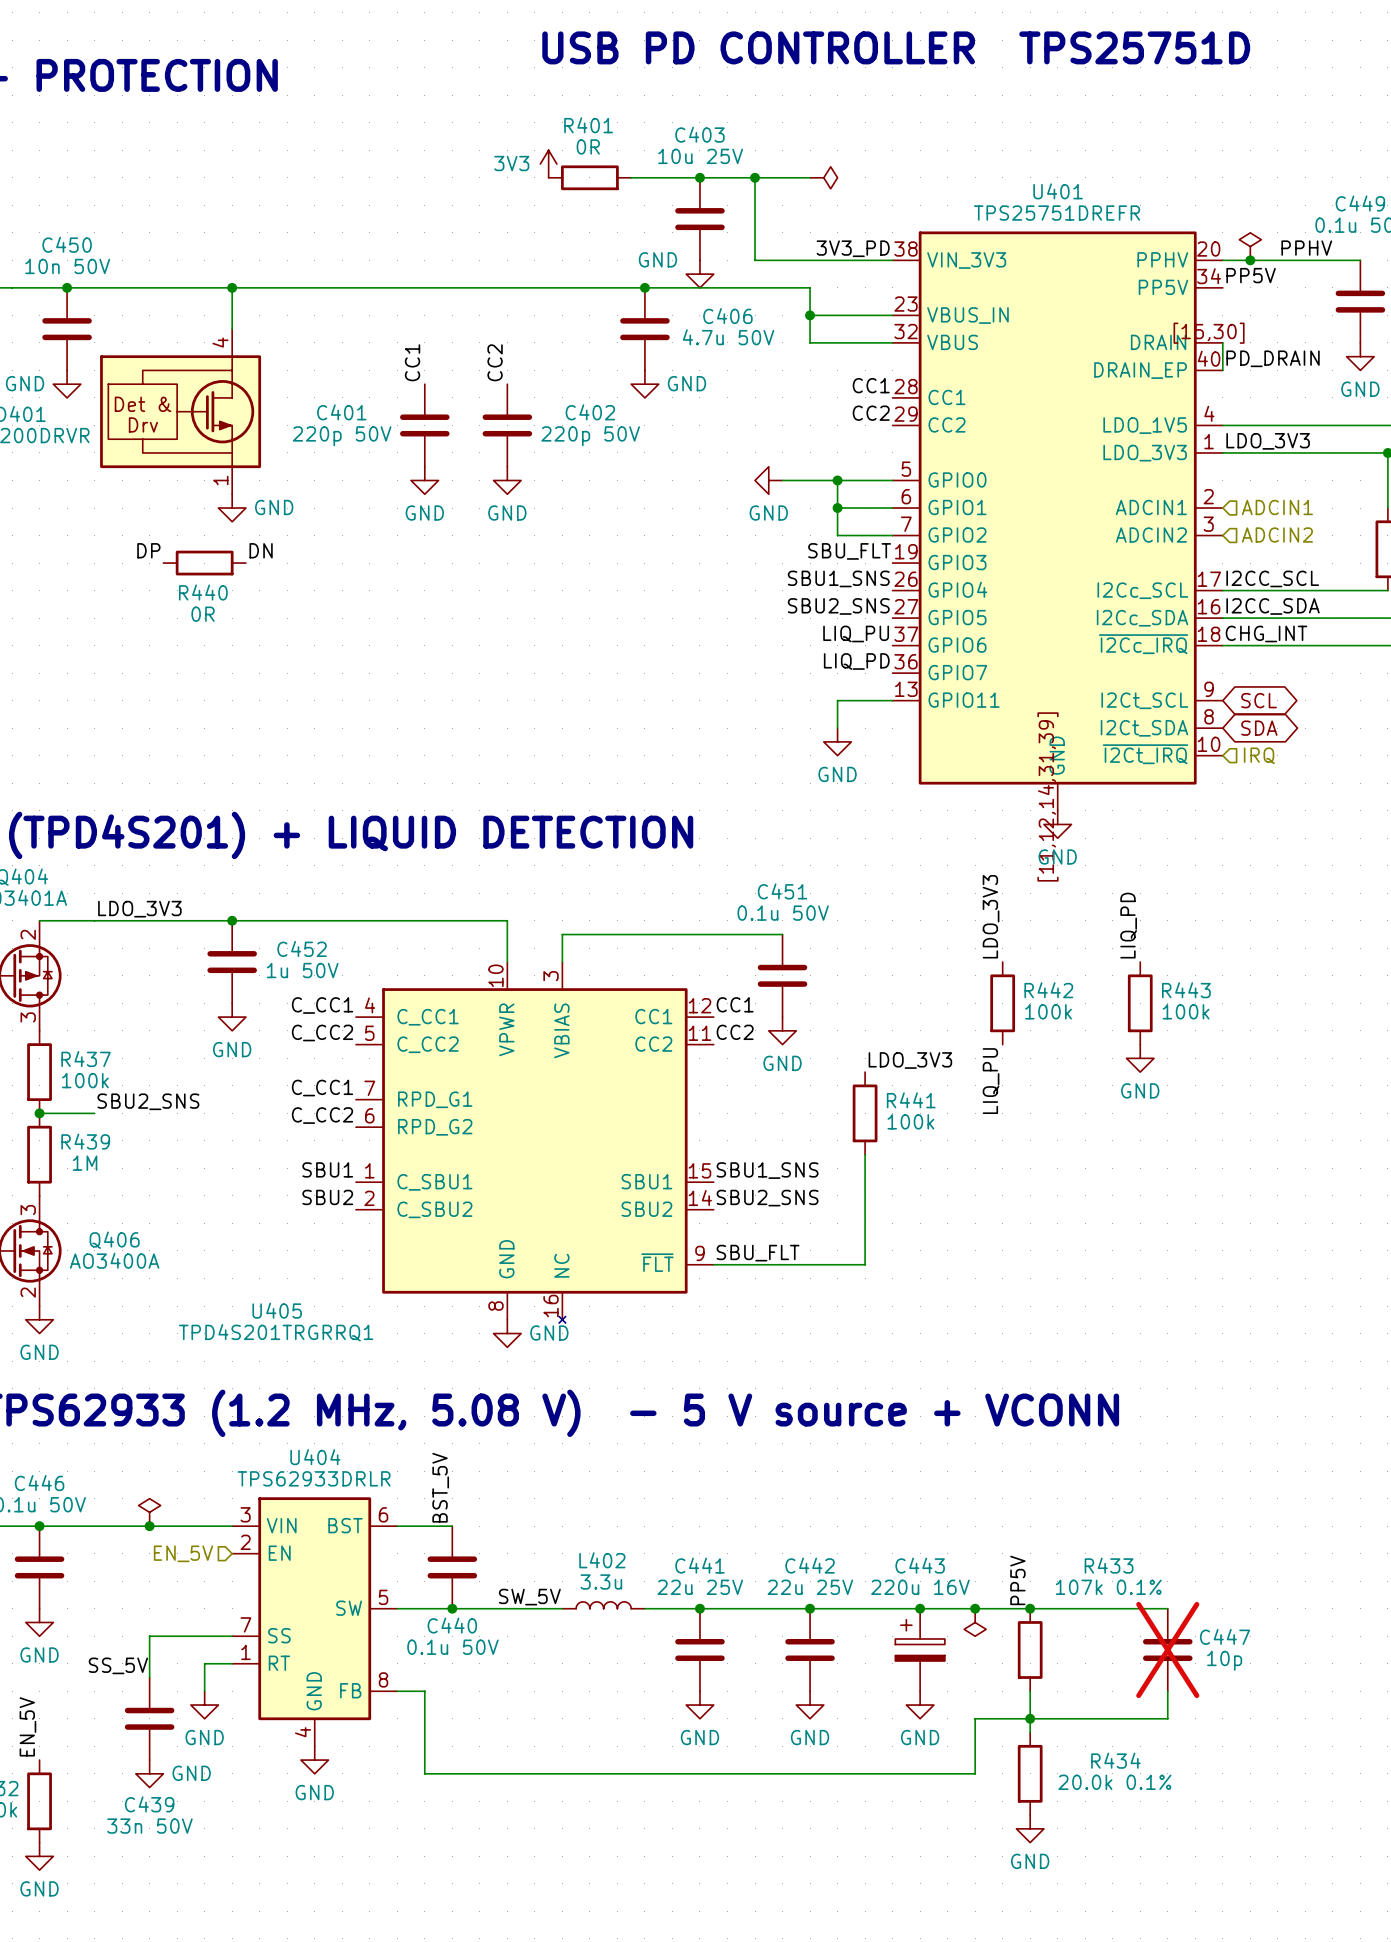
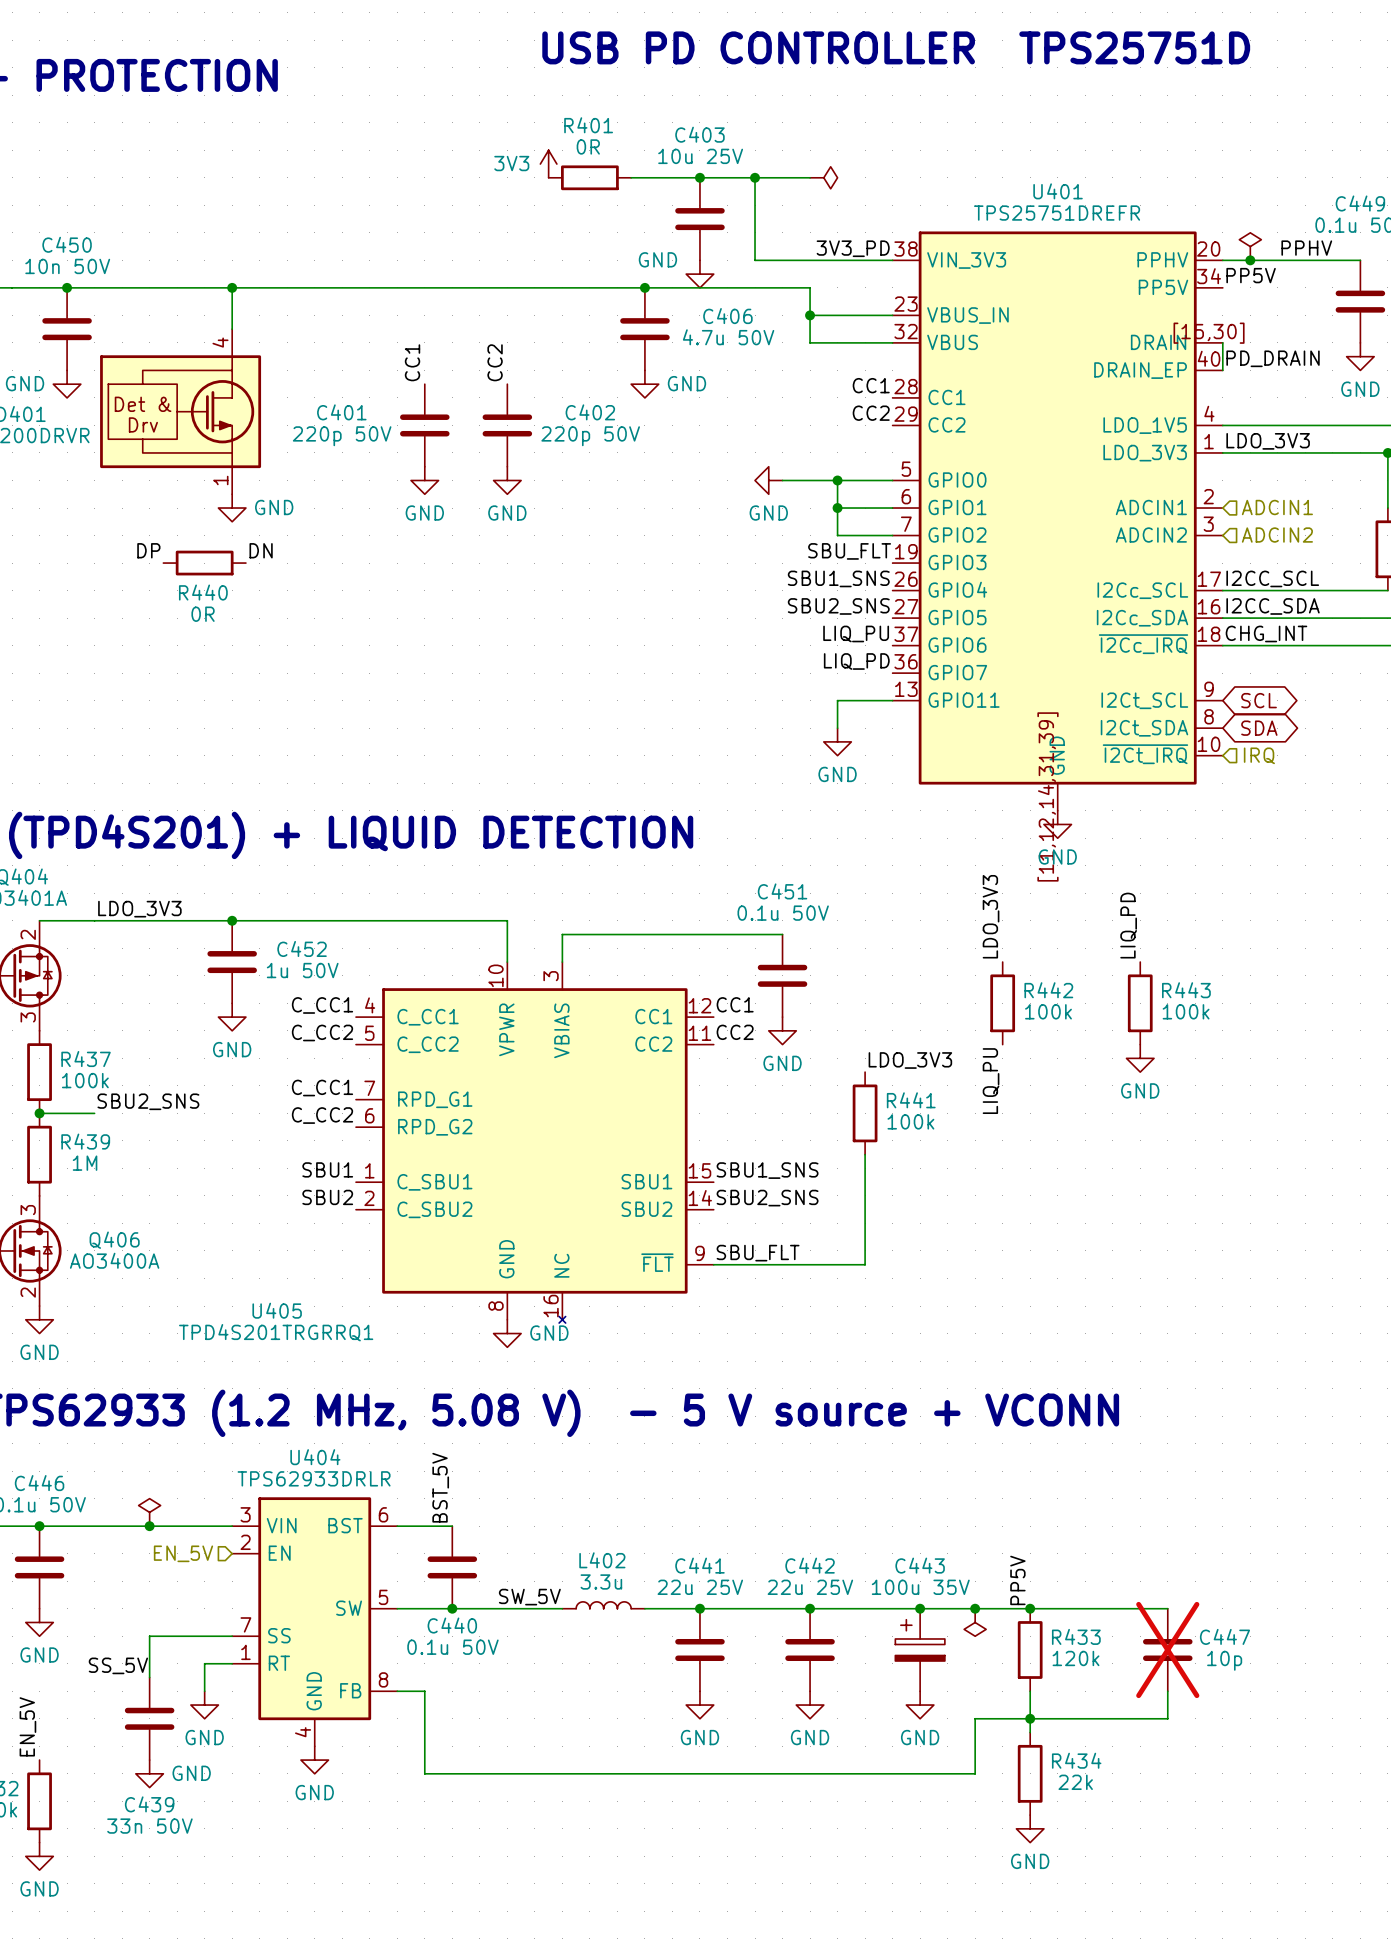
R433 name position: R433 (1109, 1565) -> R433 (1076, 1636)
C443 value: 220u 16V (920, 1587) -> 100u 35V (920, 1587)
R433 value: 107k 0.1% (1108, 1587) -> 120k (1076, 1658)
R434 name position: R434 (1115, 1760) -> R434 (1076, 1760)
R434 value: 20.0k 0.1% (1114, 1782) -> 22k (1075, 1782)

